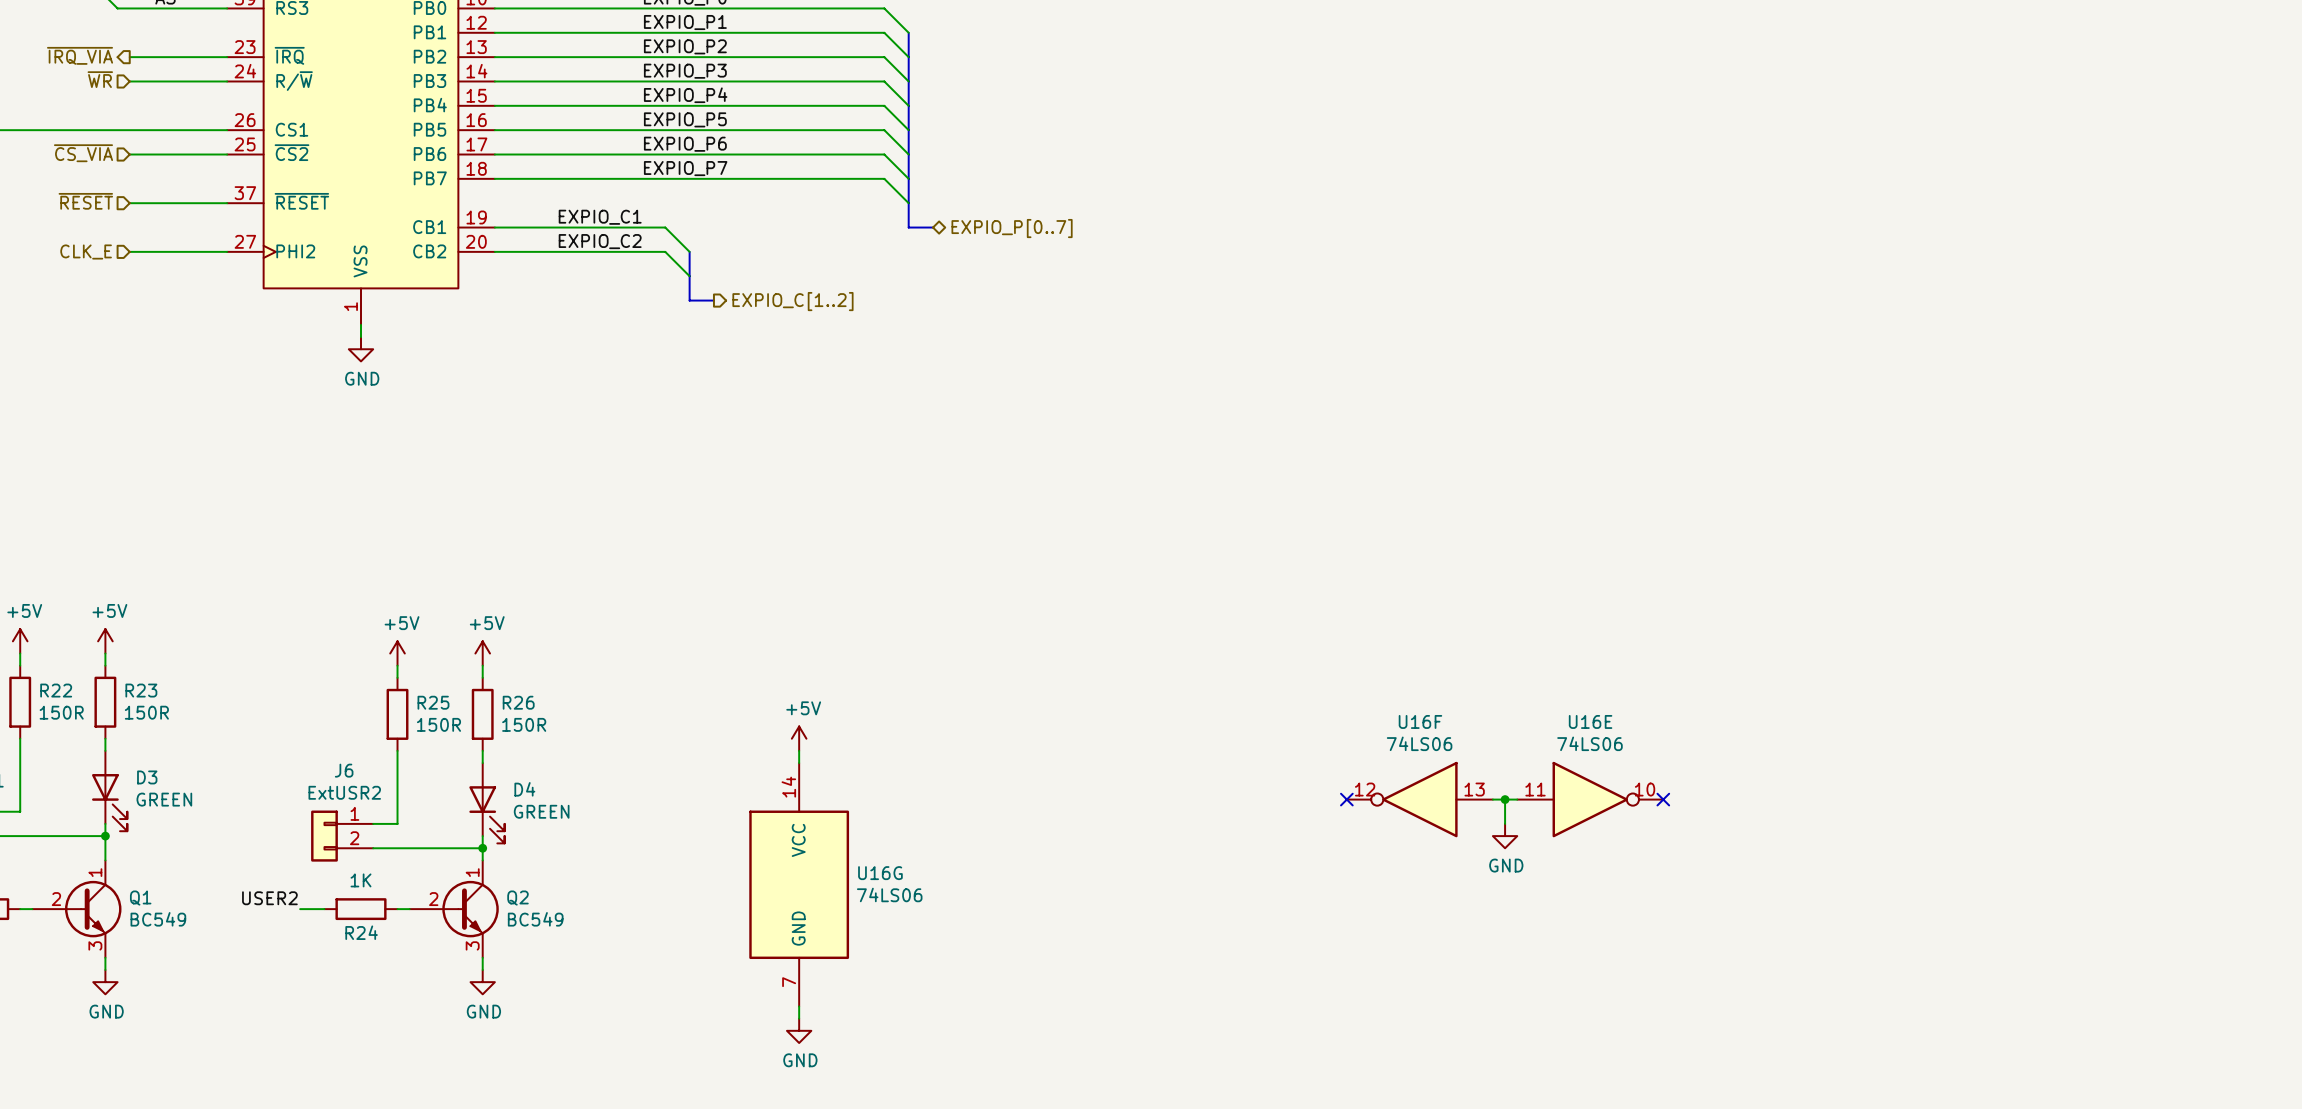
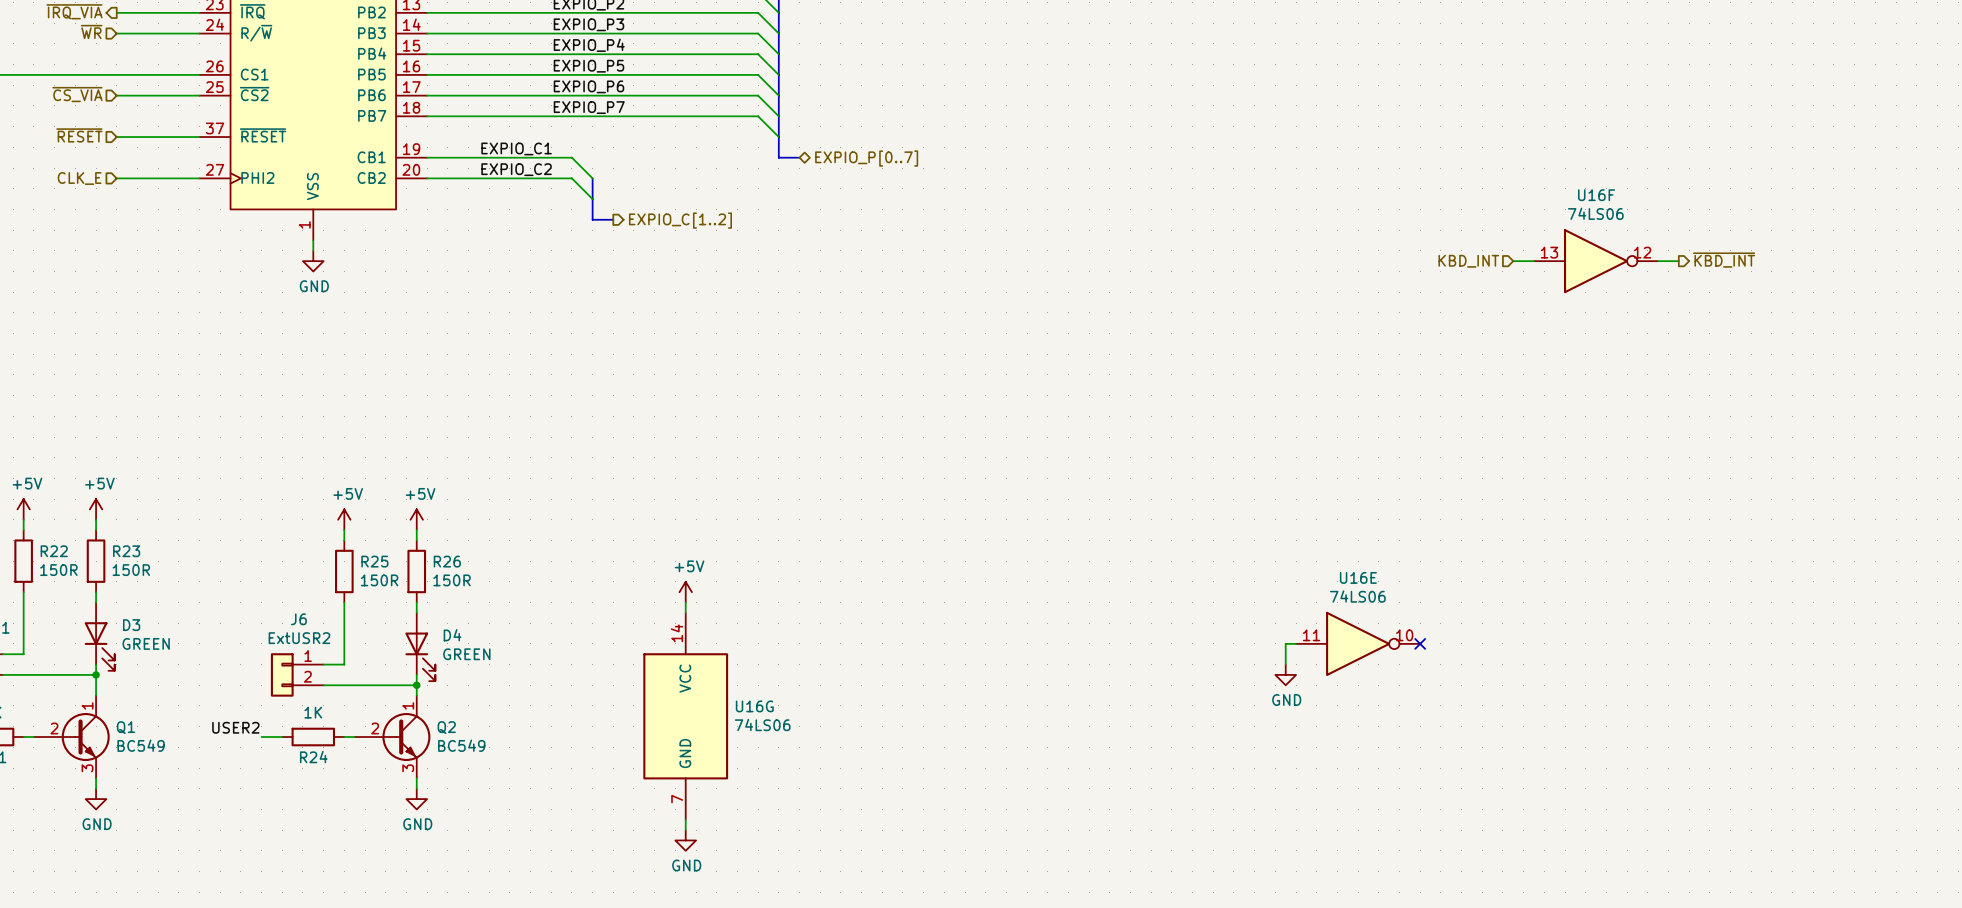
hierarchical label: none -> ~{KBD_INT} (1724, 260)
hierarchical label: none -> KBD_INT (1468, 261)
wire: none -> (1513, 261) (1533, 261)
wire: none -> (1658, 261) (1678, 261)
no-connect mark: (1346, 799) -> none
U16F rotation: 0° (1419, 799) -> 180° (1596, 261)
U16F position: (1419, 799) -> (1596, 261)
wire: (1492, 799) (1505, 799) -> none
junction: (1505, 799) -> none

